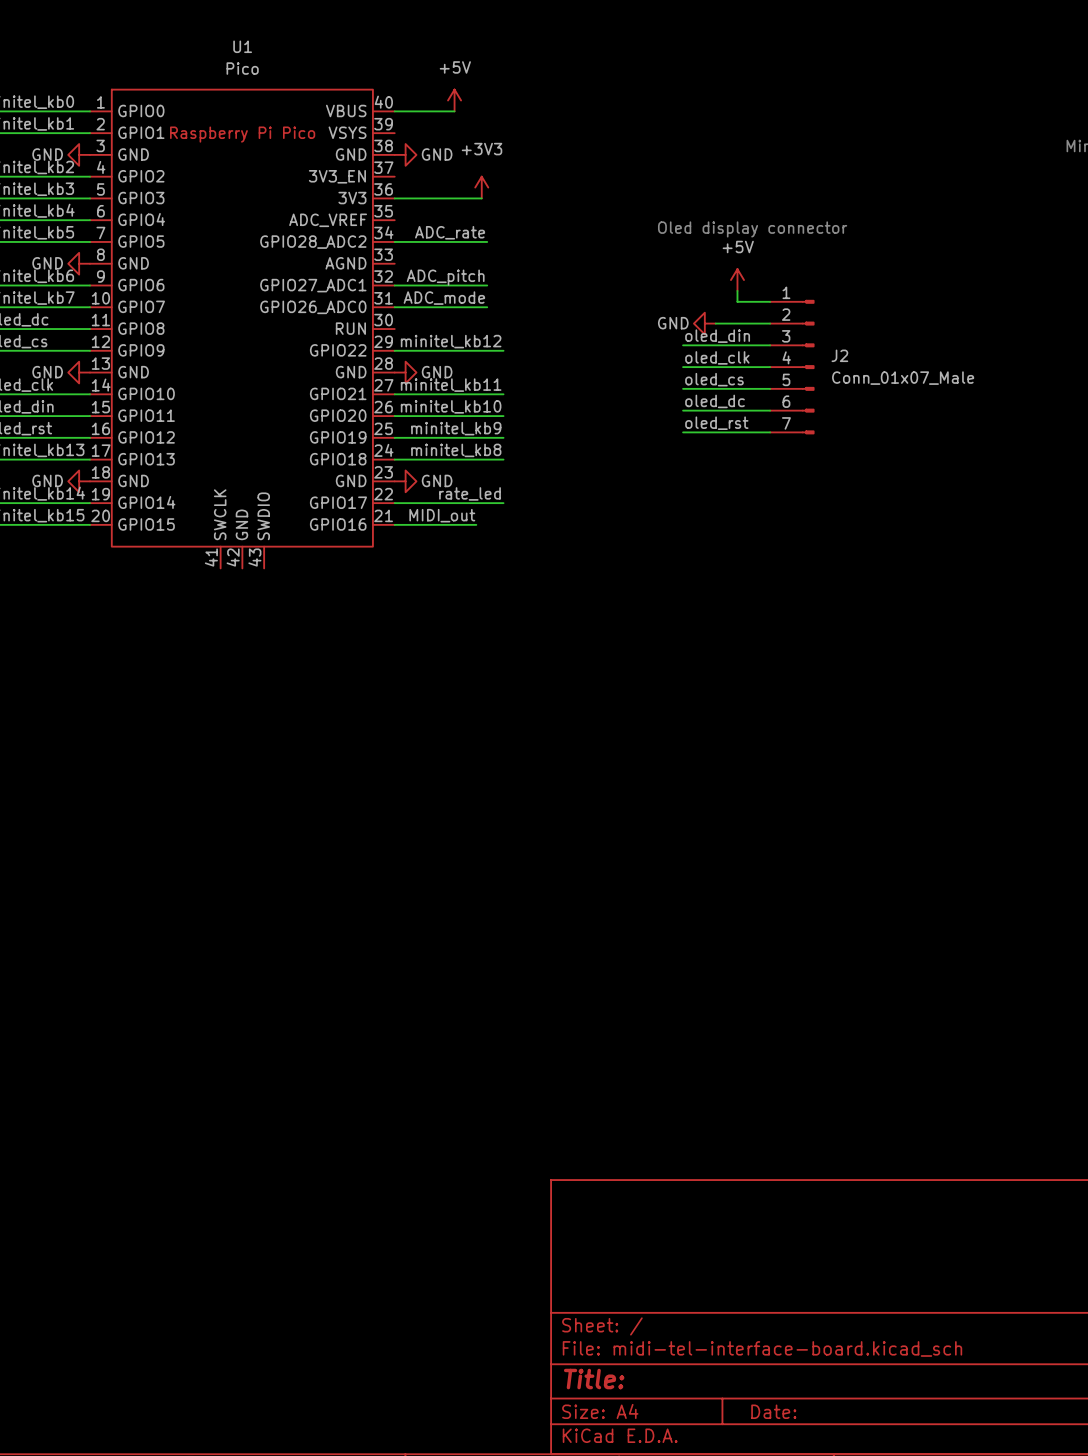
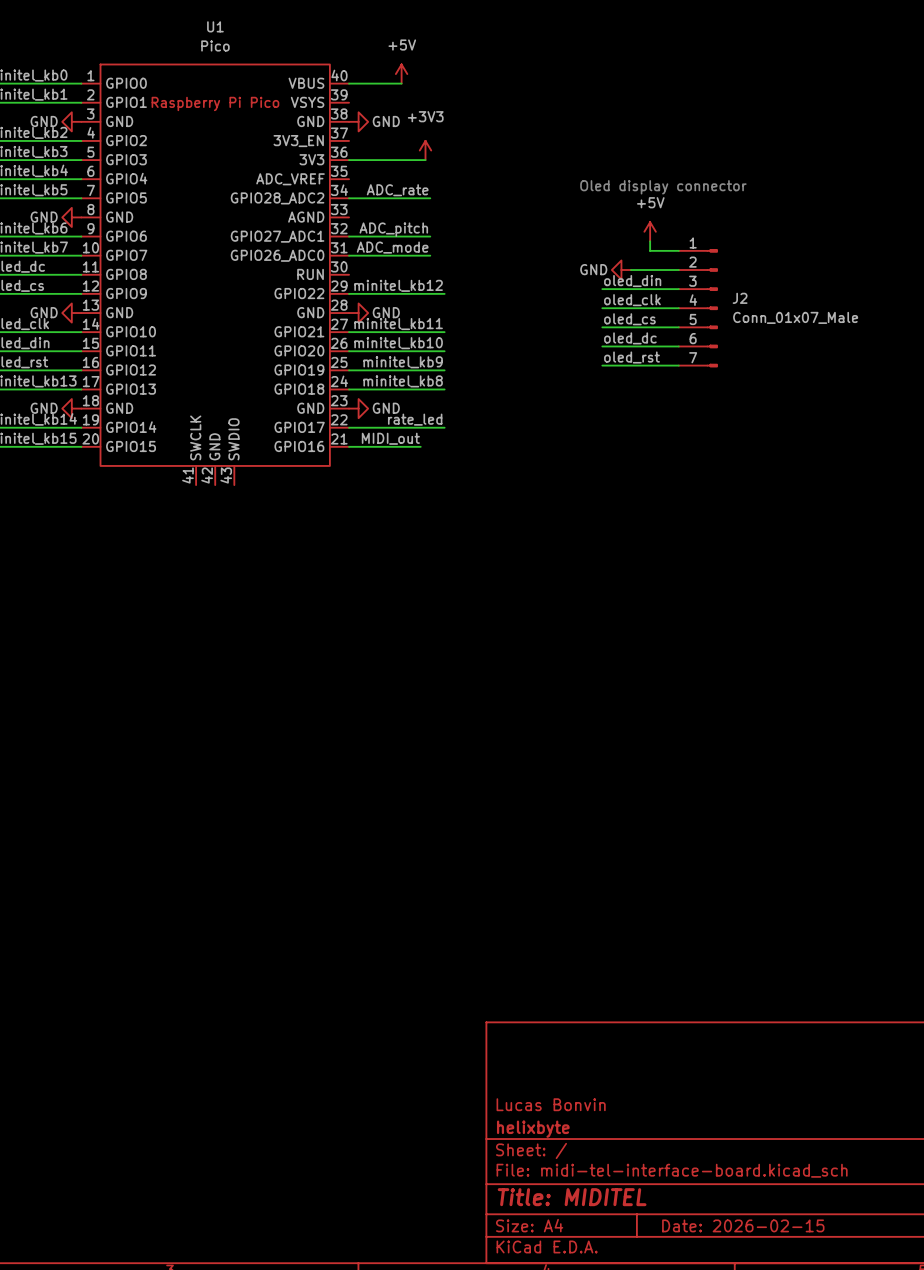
title block: none -> Lucas Bonvin (551, 1104)
title block: none -> helixbyte (533, 1129)
title block: Title: (594, 1379) -> Title: MIDITEL (572, 1197)
title block: Date: (773, 1411) -> Date: 2026-02-15 (743, 1225)

